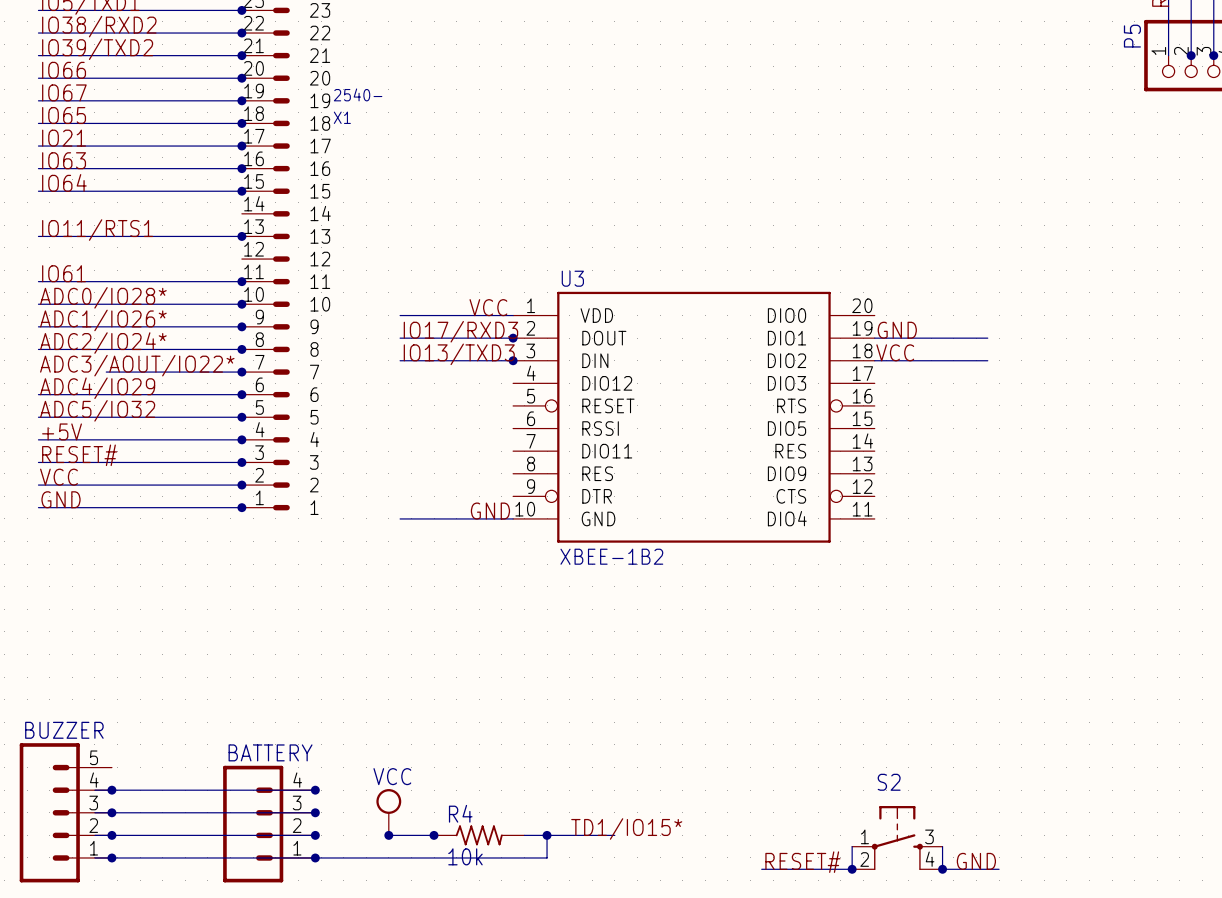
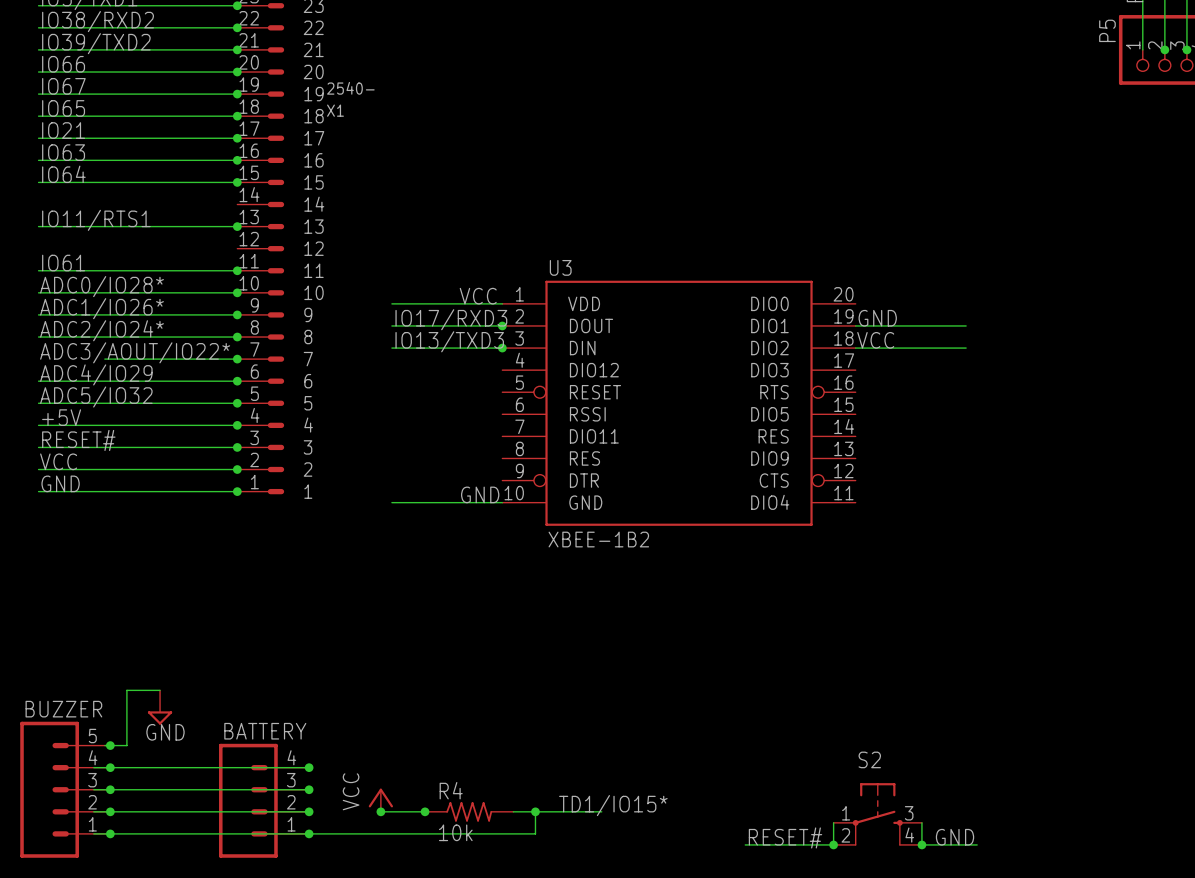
wire: none -> (160, 690) (126, 690) (126, 745) (104, 745)
power symbol: none -> GND (160, 707)
junction: none -> (110, 745)
power symbol: VCC (388, 812) -> none
power symbol: none -> VCC (380, 800)

